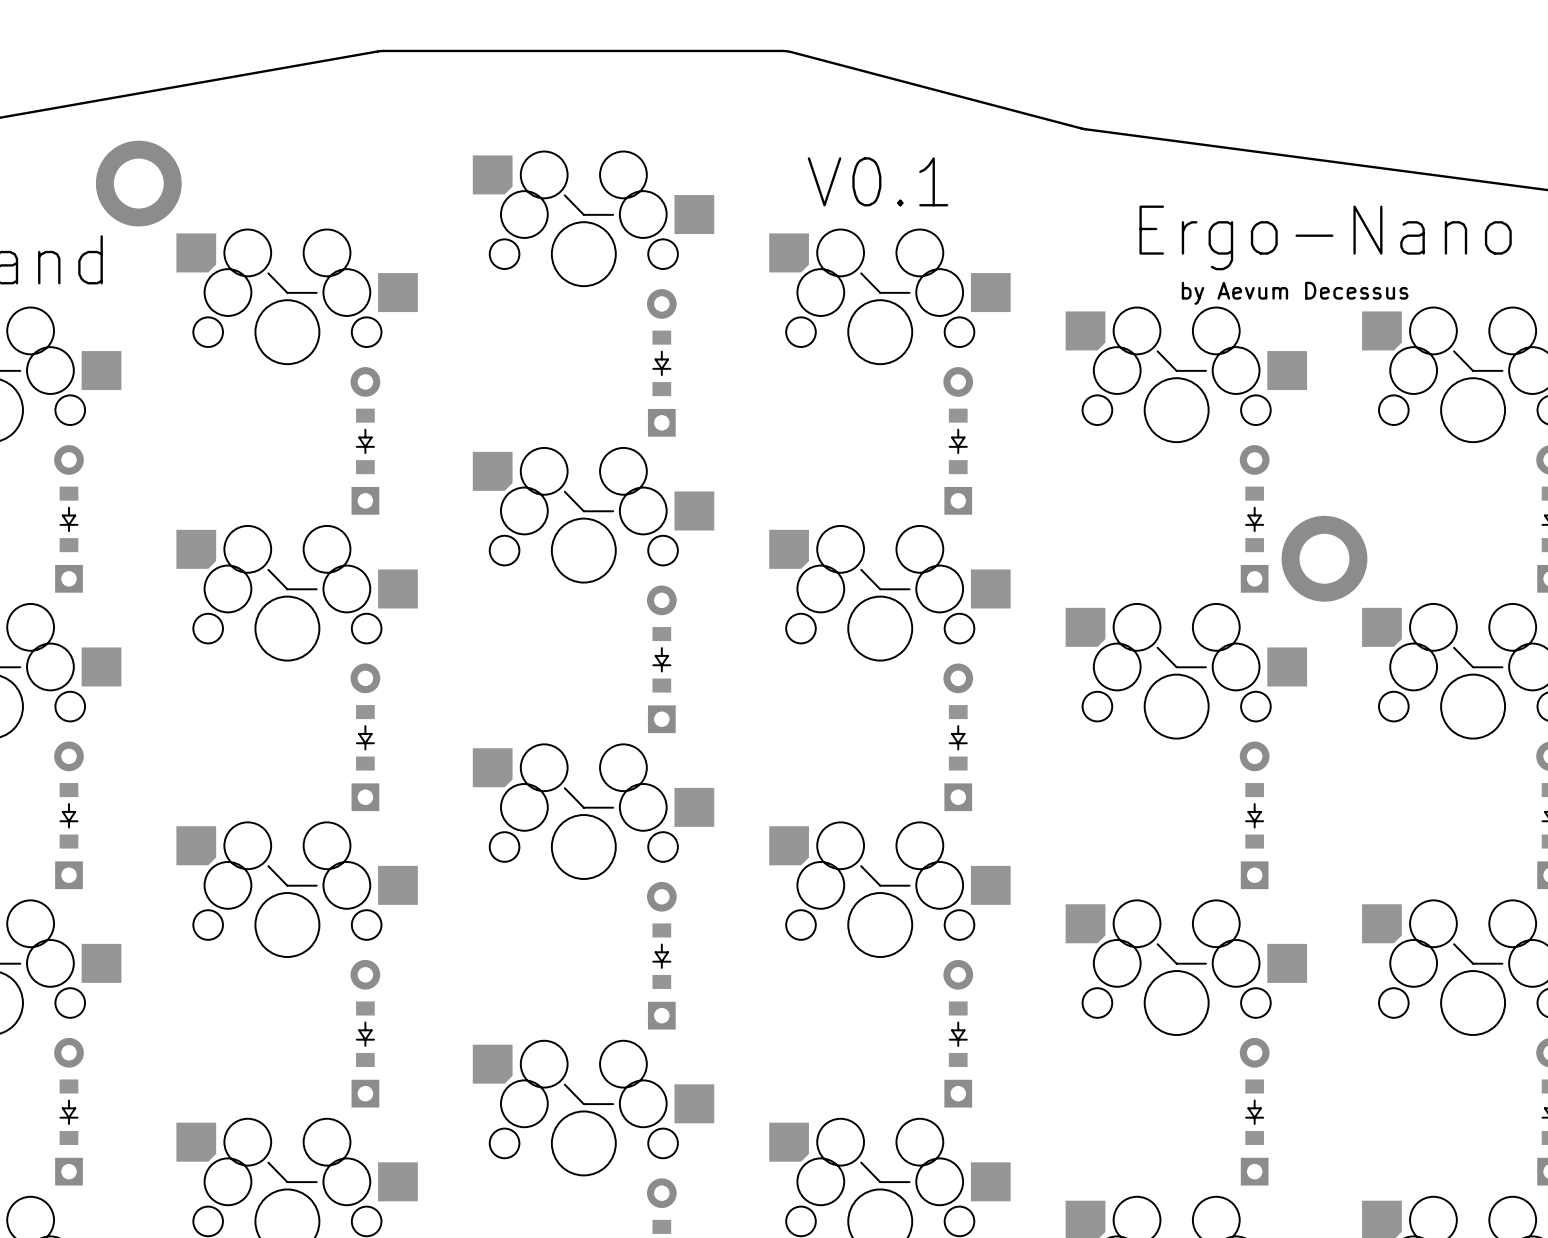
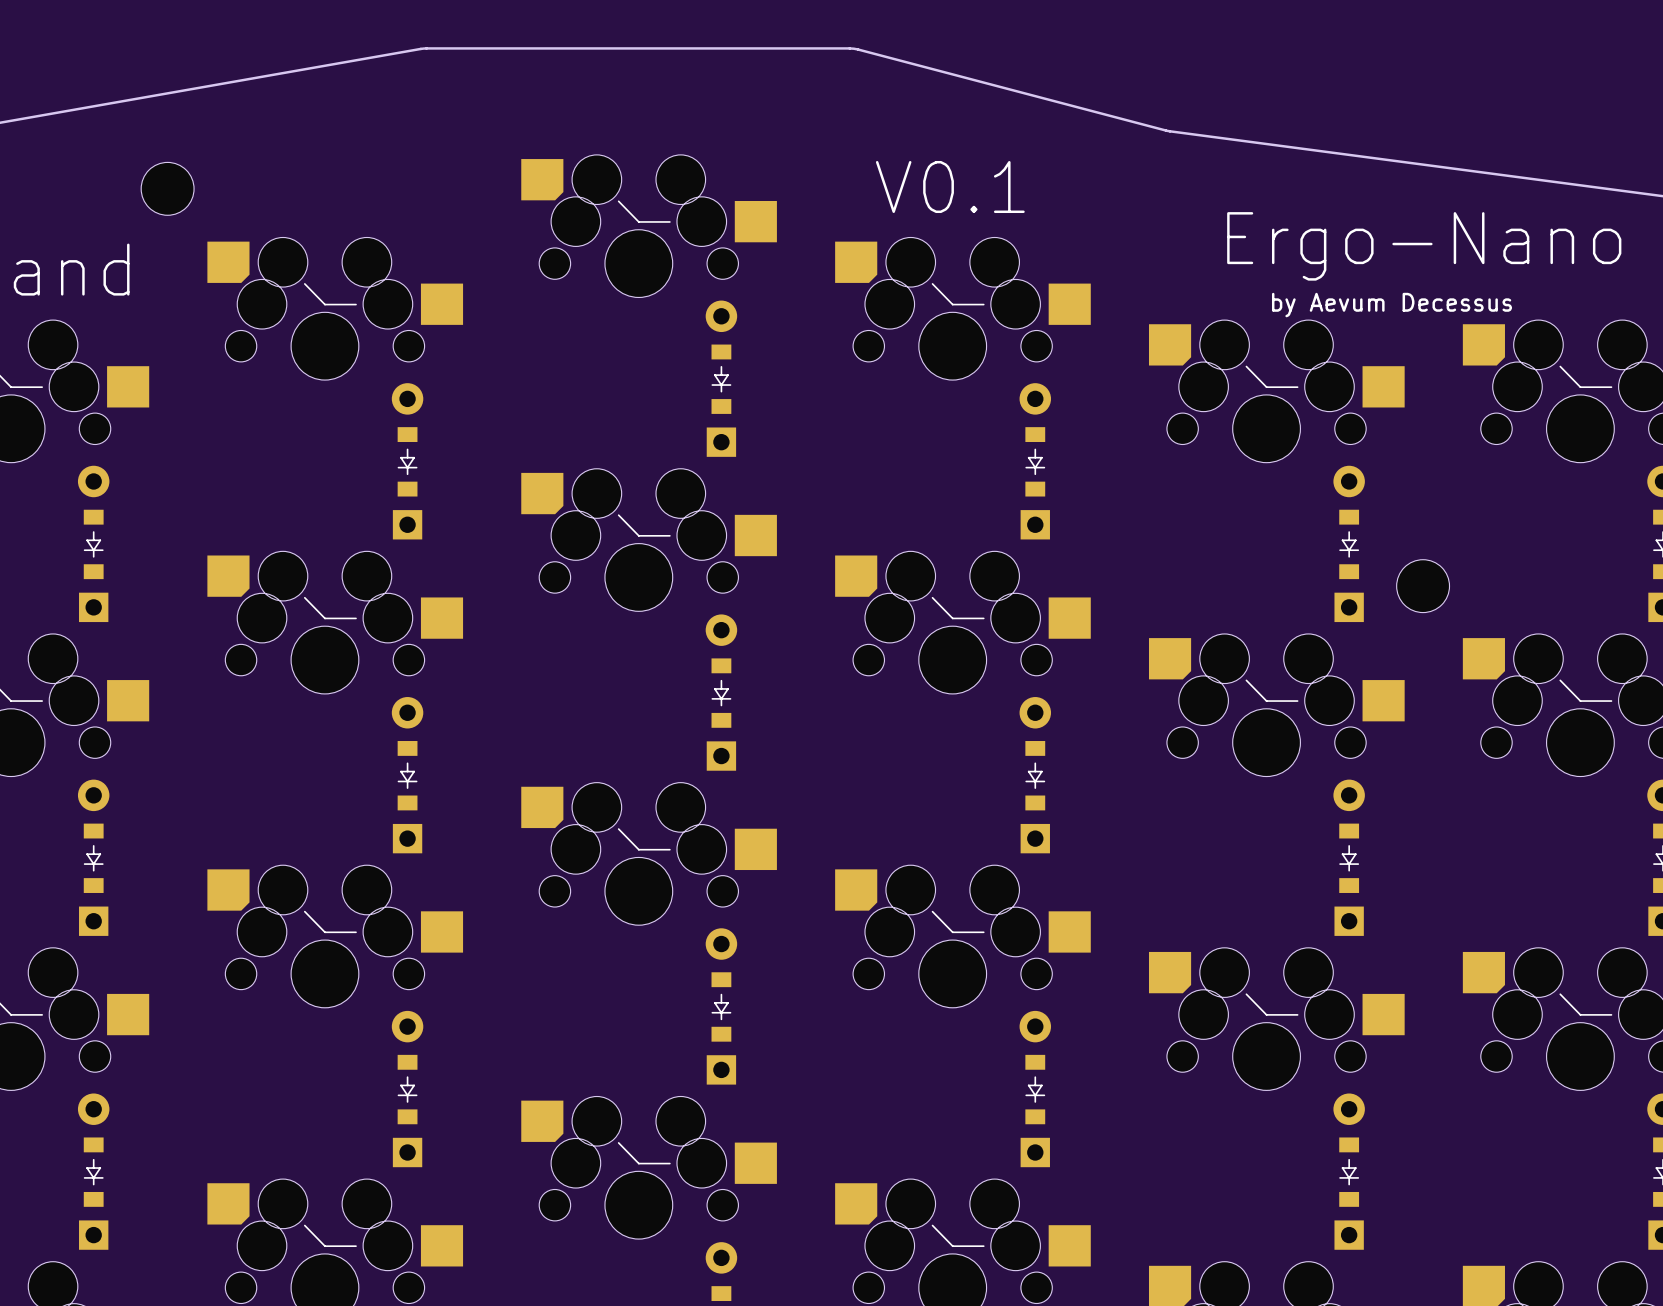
part footprint: [95, 140, 182, 227] -> [141, 162, 195, 216]
part footprint: [1281, 515, 1368, 602] -> [1396, 559, 1450, 613]

